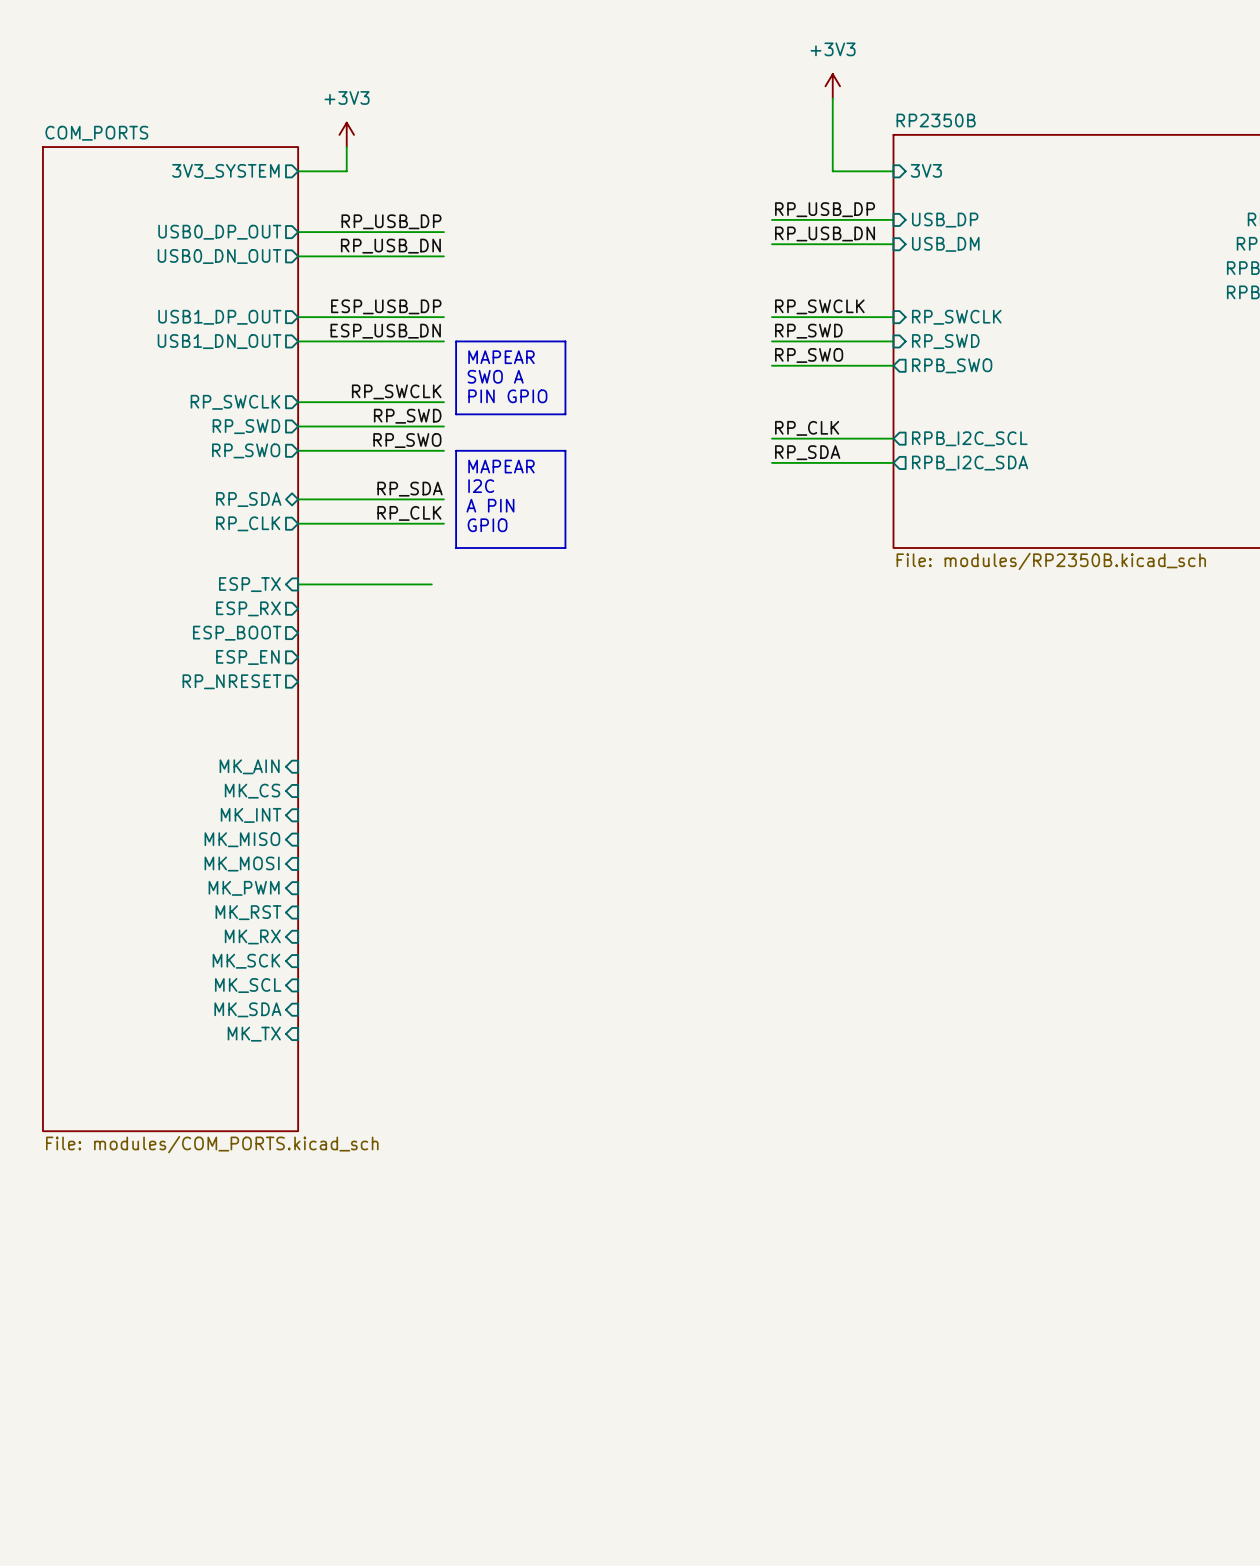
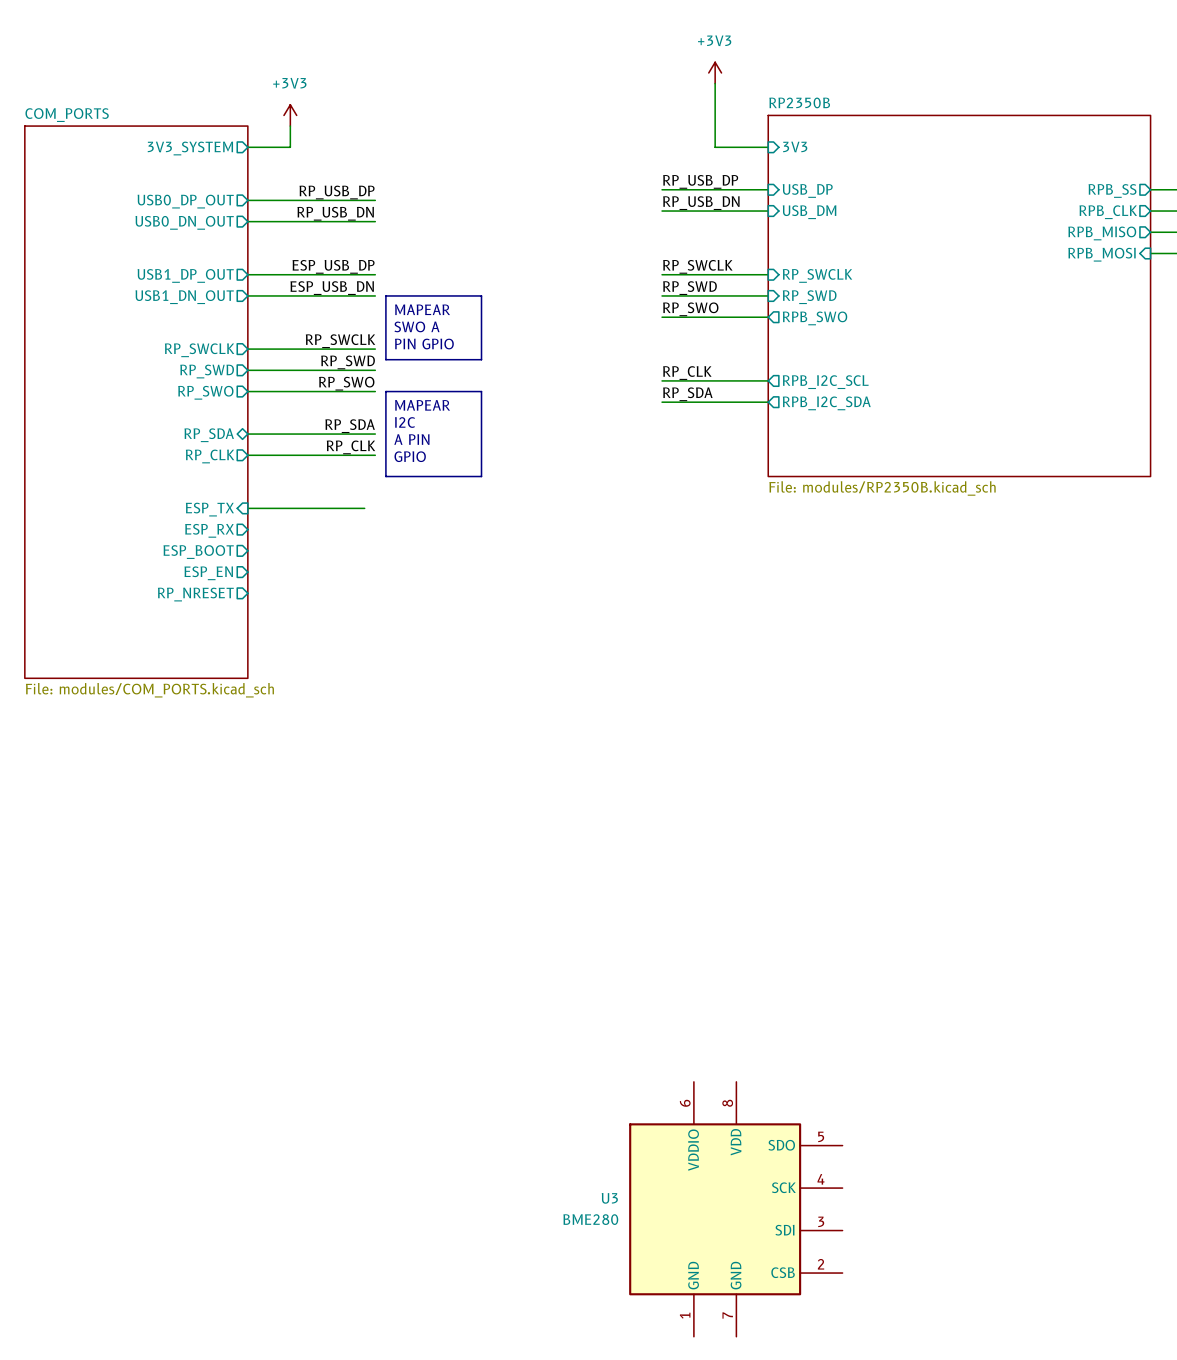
sheet COM_PORTS: none -> File: modules/COM_PORTS.kicad_sch (136, 402)
sheet COM_PORTS: File: modules/COM_PORTS.kicad_sch (170, 639) -> none
sheet pin: MK_AIN (249, 766) -> none
sheet pin: MK_CS (252, 791) -> none
sheet pin: MK_INT (251, 815) -> none
sheet pin: MK_MISO (242, 839) -> none
sheet pin: MK_MOSI (242, 864) -> none
sheet pin: MK_PWM (244, 888) -> none
sheet pin: MK_RST (248, 912) -> none
sheet pin: MK_RX (252, 936) -> none
sheet pin: MK_SCK (246, 961) -> none
sheet pin: MK_SCL (248, 985) -> none
sheet pin: MK_SDA (247, 1009) -> none
sheet pin: MK_TX (254, 1034) -> none
U3: none -> BME280 (735, 1209)

